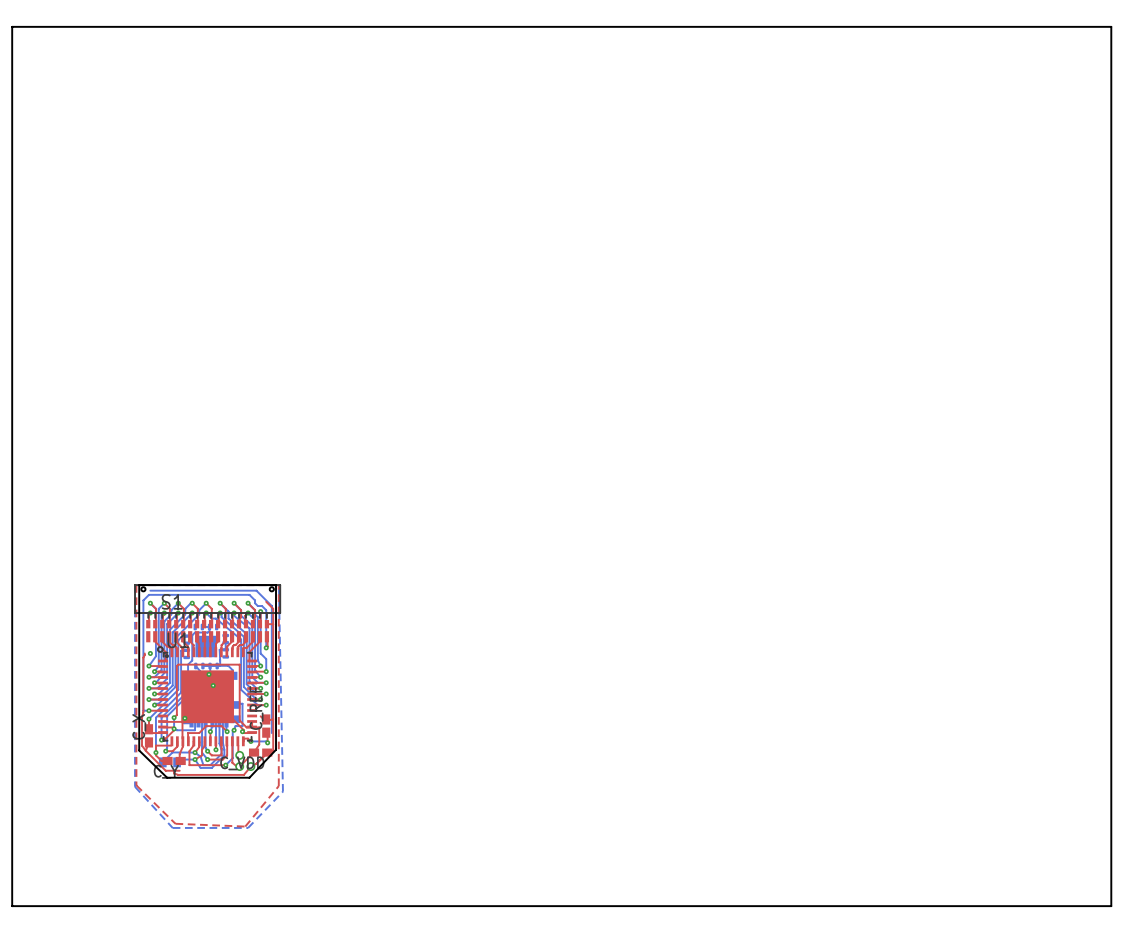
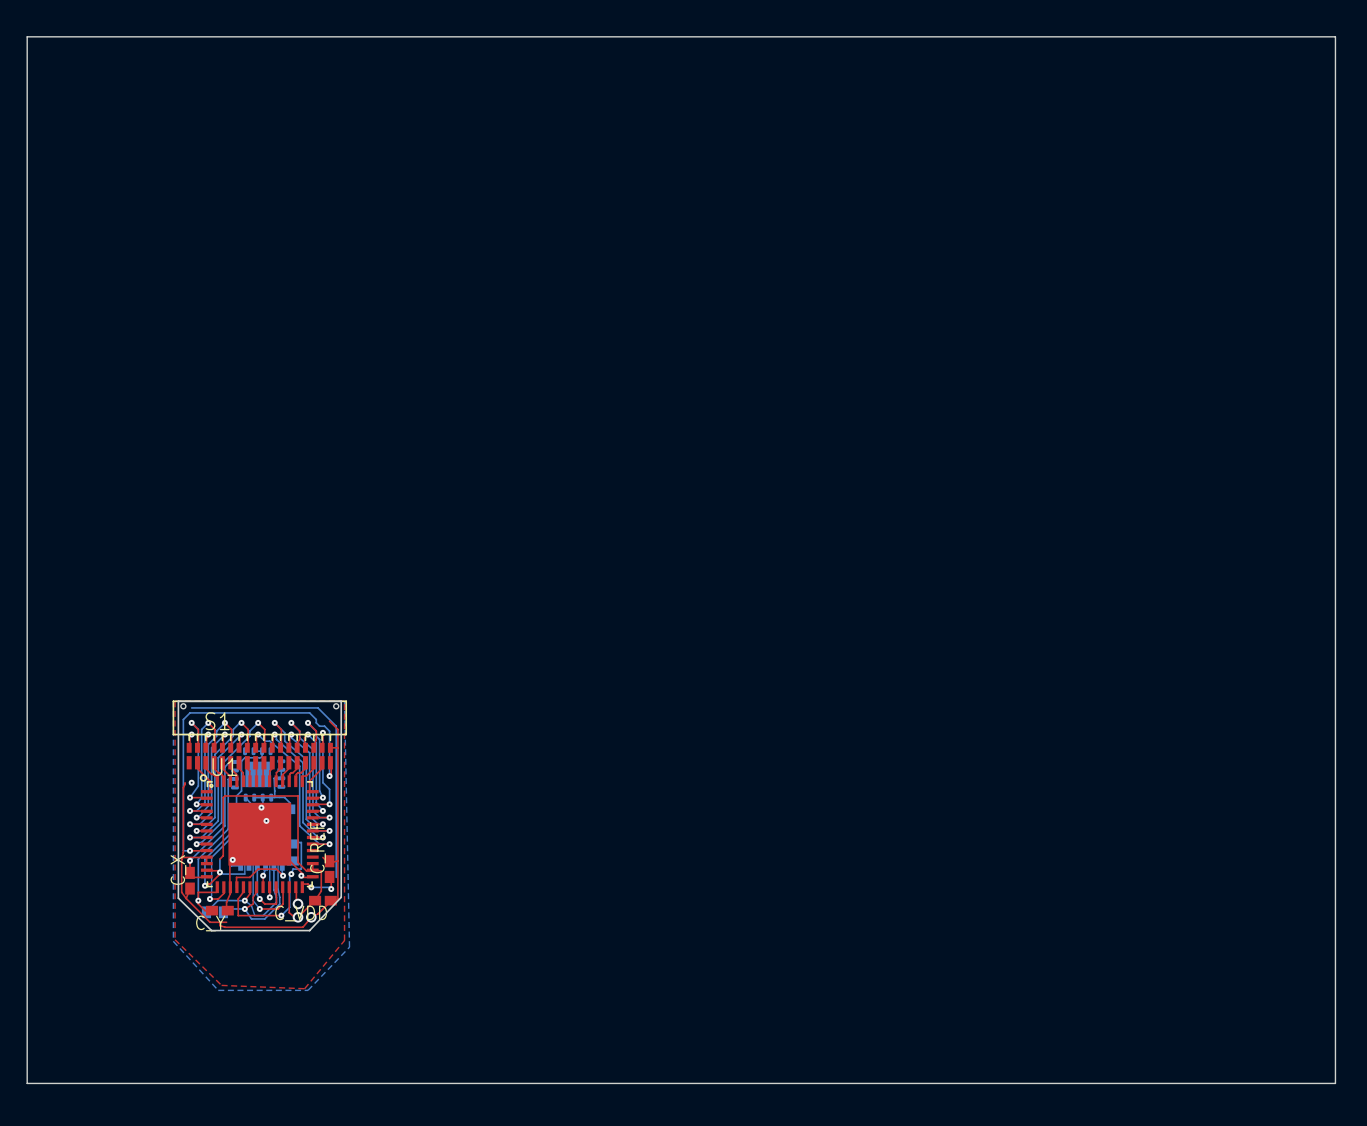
via: (174, 717) -> none
top track: (162, 721) (182, 721) -> (206, 863) (206, 857) (181, 857) (181, 859)

